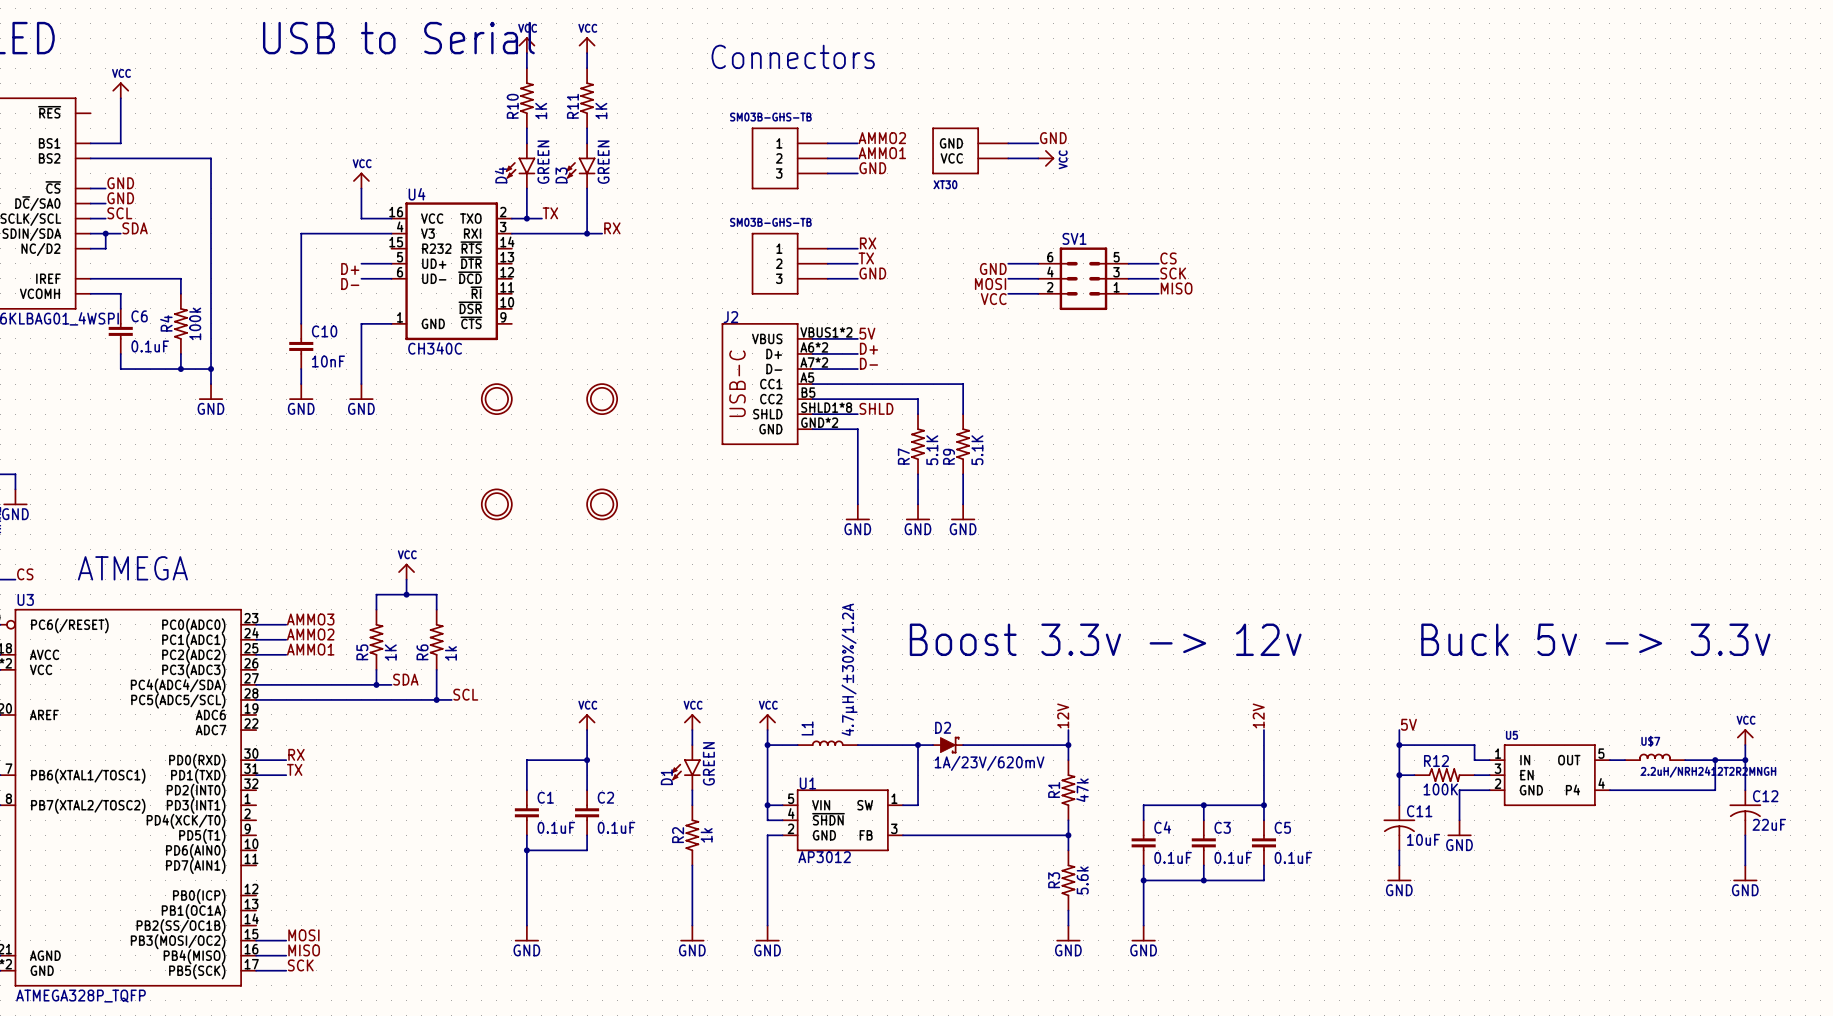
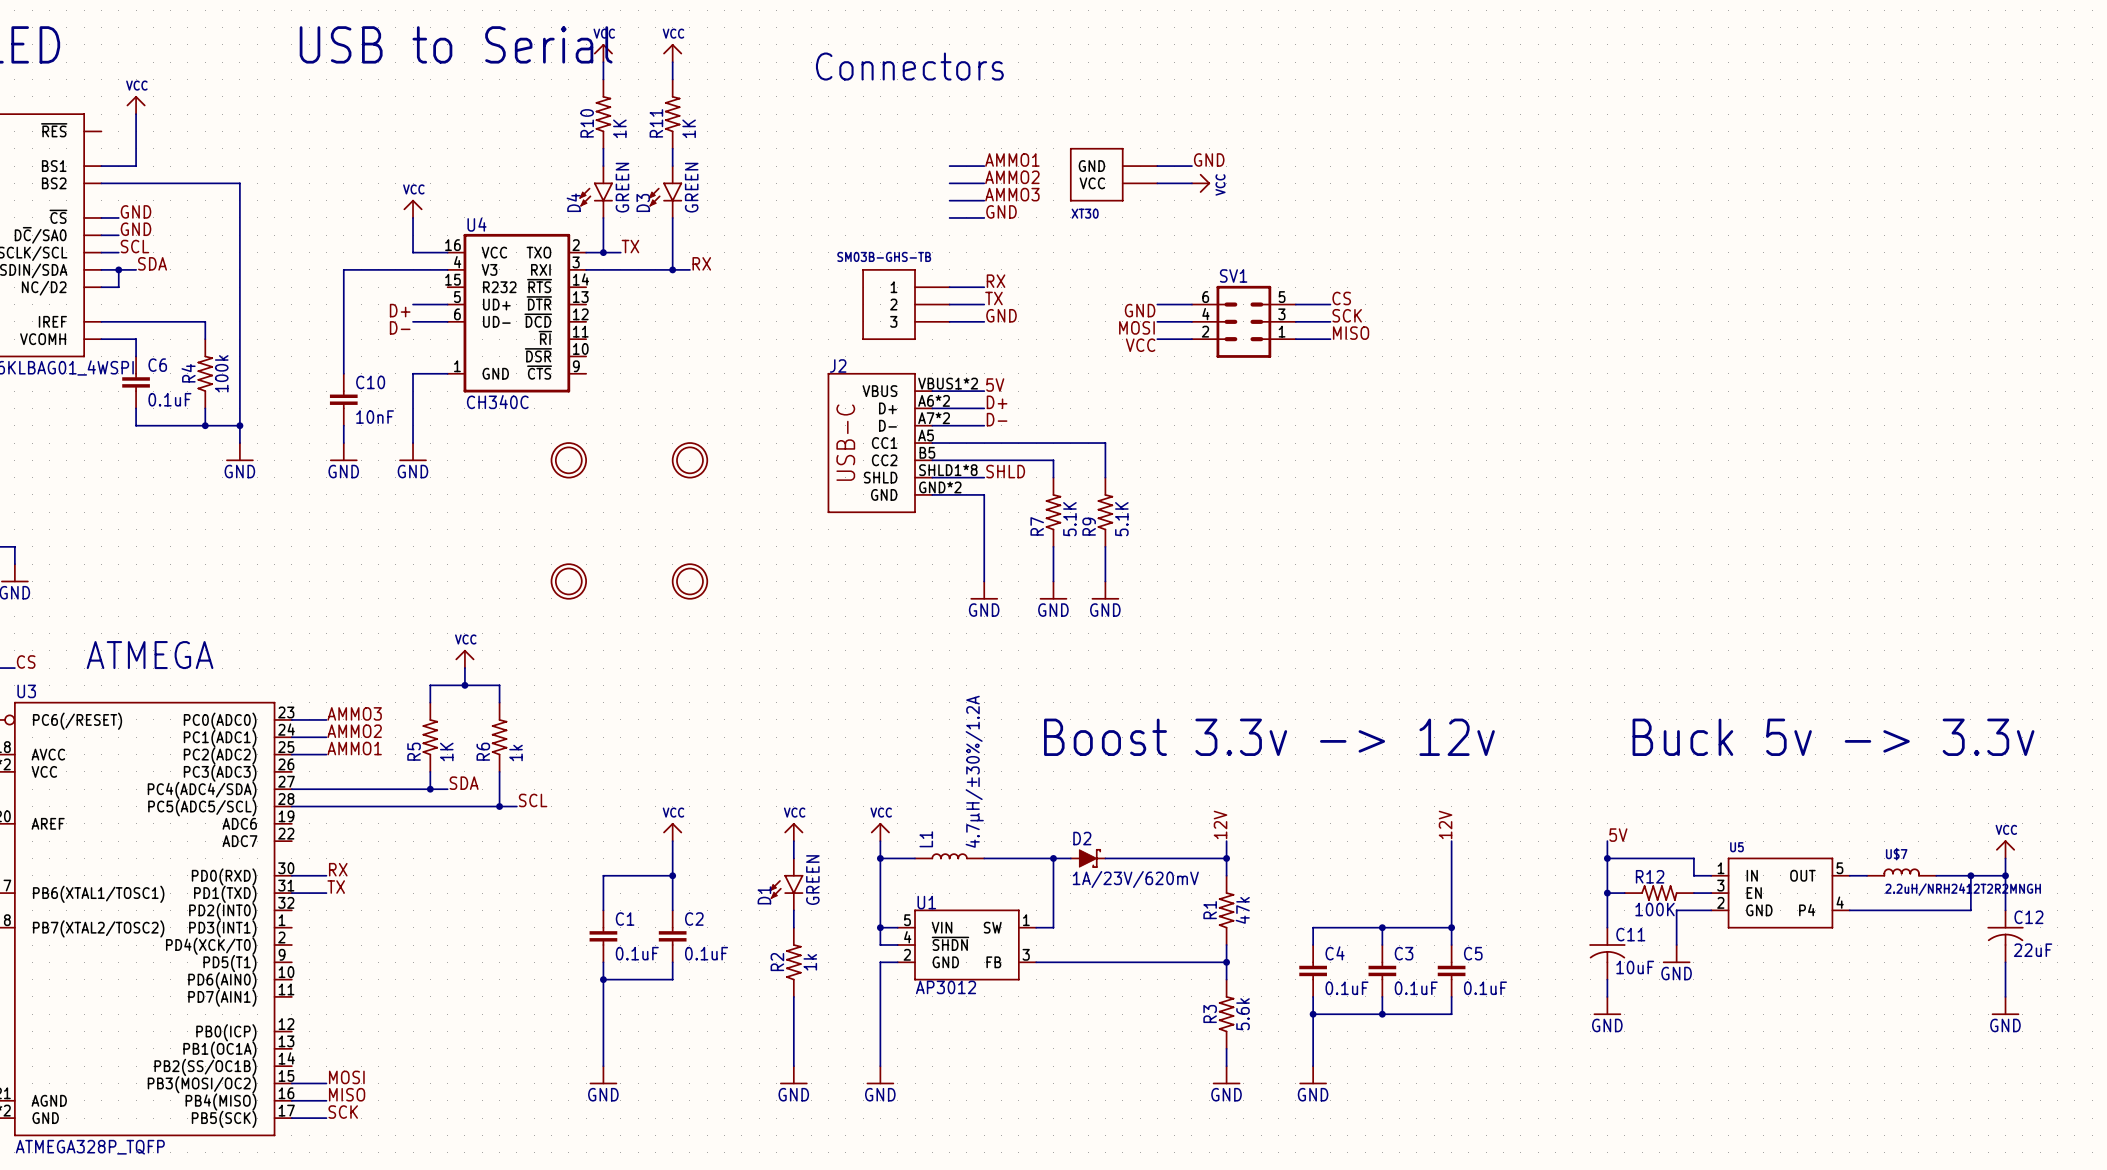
label: AMMO2 (882, 138) -> AMMO1 (1012, 160)
label: AMMO1 (882, 153) -> AMMO2 (1012, 177)
part: (789, 158) -> none
label: GND (872, 168) -> AMMO3 (1012, 194)
label: none -> GND (1001, 211)
wire: none -> (949, 217) (984, 217)

